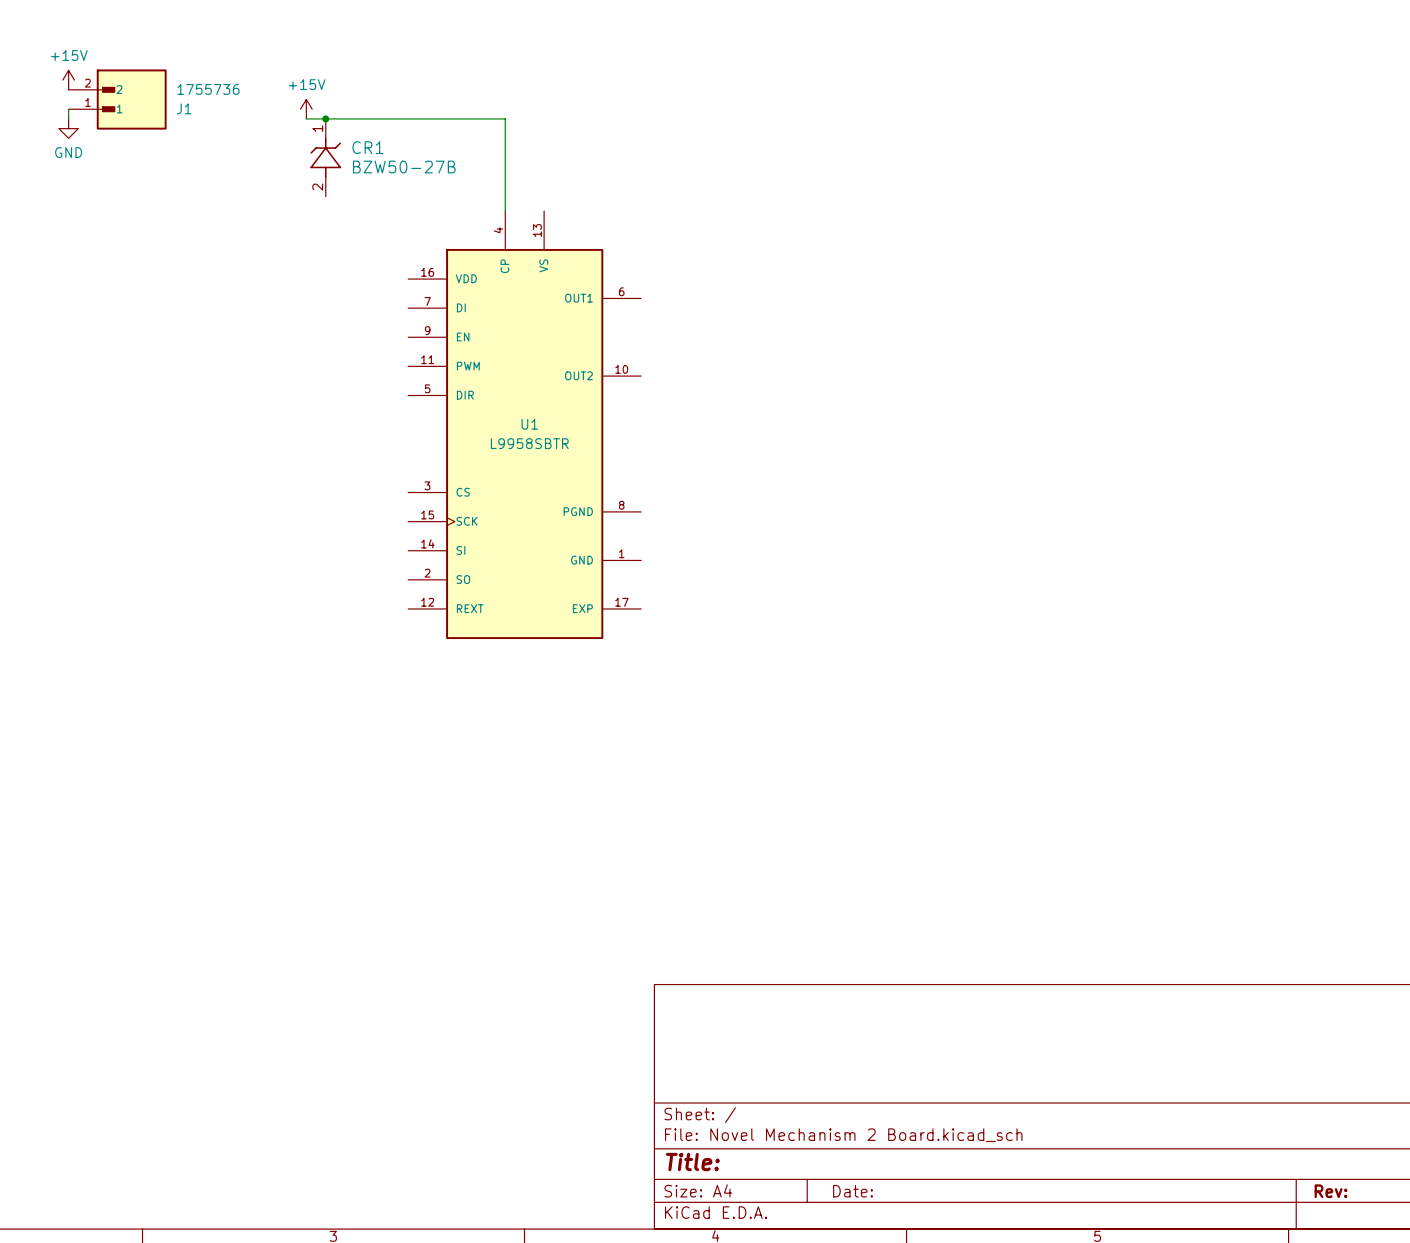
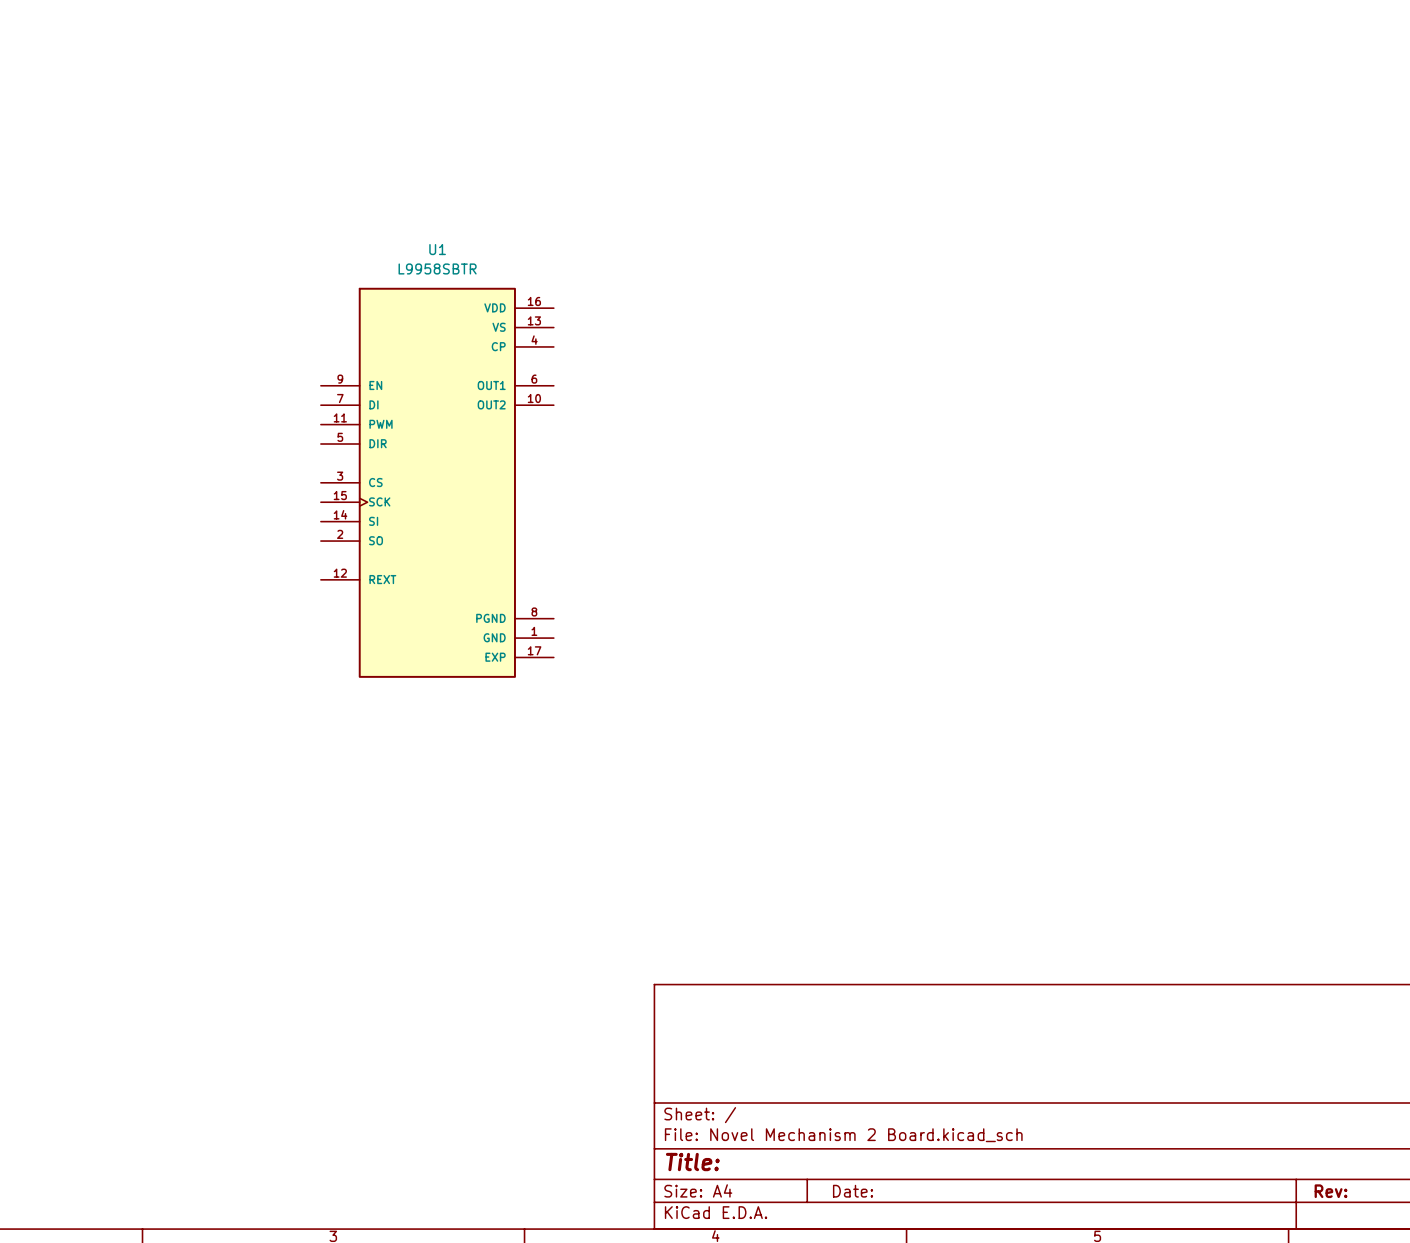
power symbol: +15V (68, 80) -> none
J1: 1755736 (117, 99) -> none
wire: (68, 109) (68, 118) -> none
power symbol: +15V (306, 109) -> none
wire: (306, 118) (505, 118) (505, 211) -> none
junction: (325, 118) -> none
power symbol: GND (68, 128) -> none
CR1: BZW50-27B (325, 157) -> none
U1 symbol: [408, 211, 642, 640] -> [320, 287, 554, 678]
U1 name position: U1 (529, 424) -> U1 (437, 249)
U1 value position: L9958SBTR (529, 443) -> L9958SBTR (437, 268)

